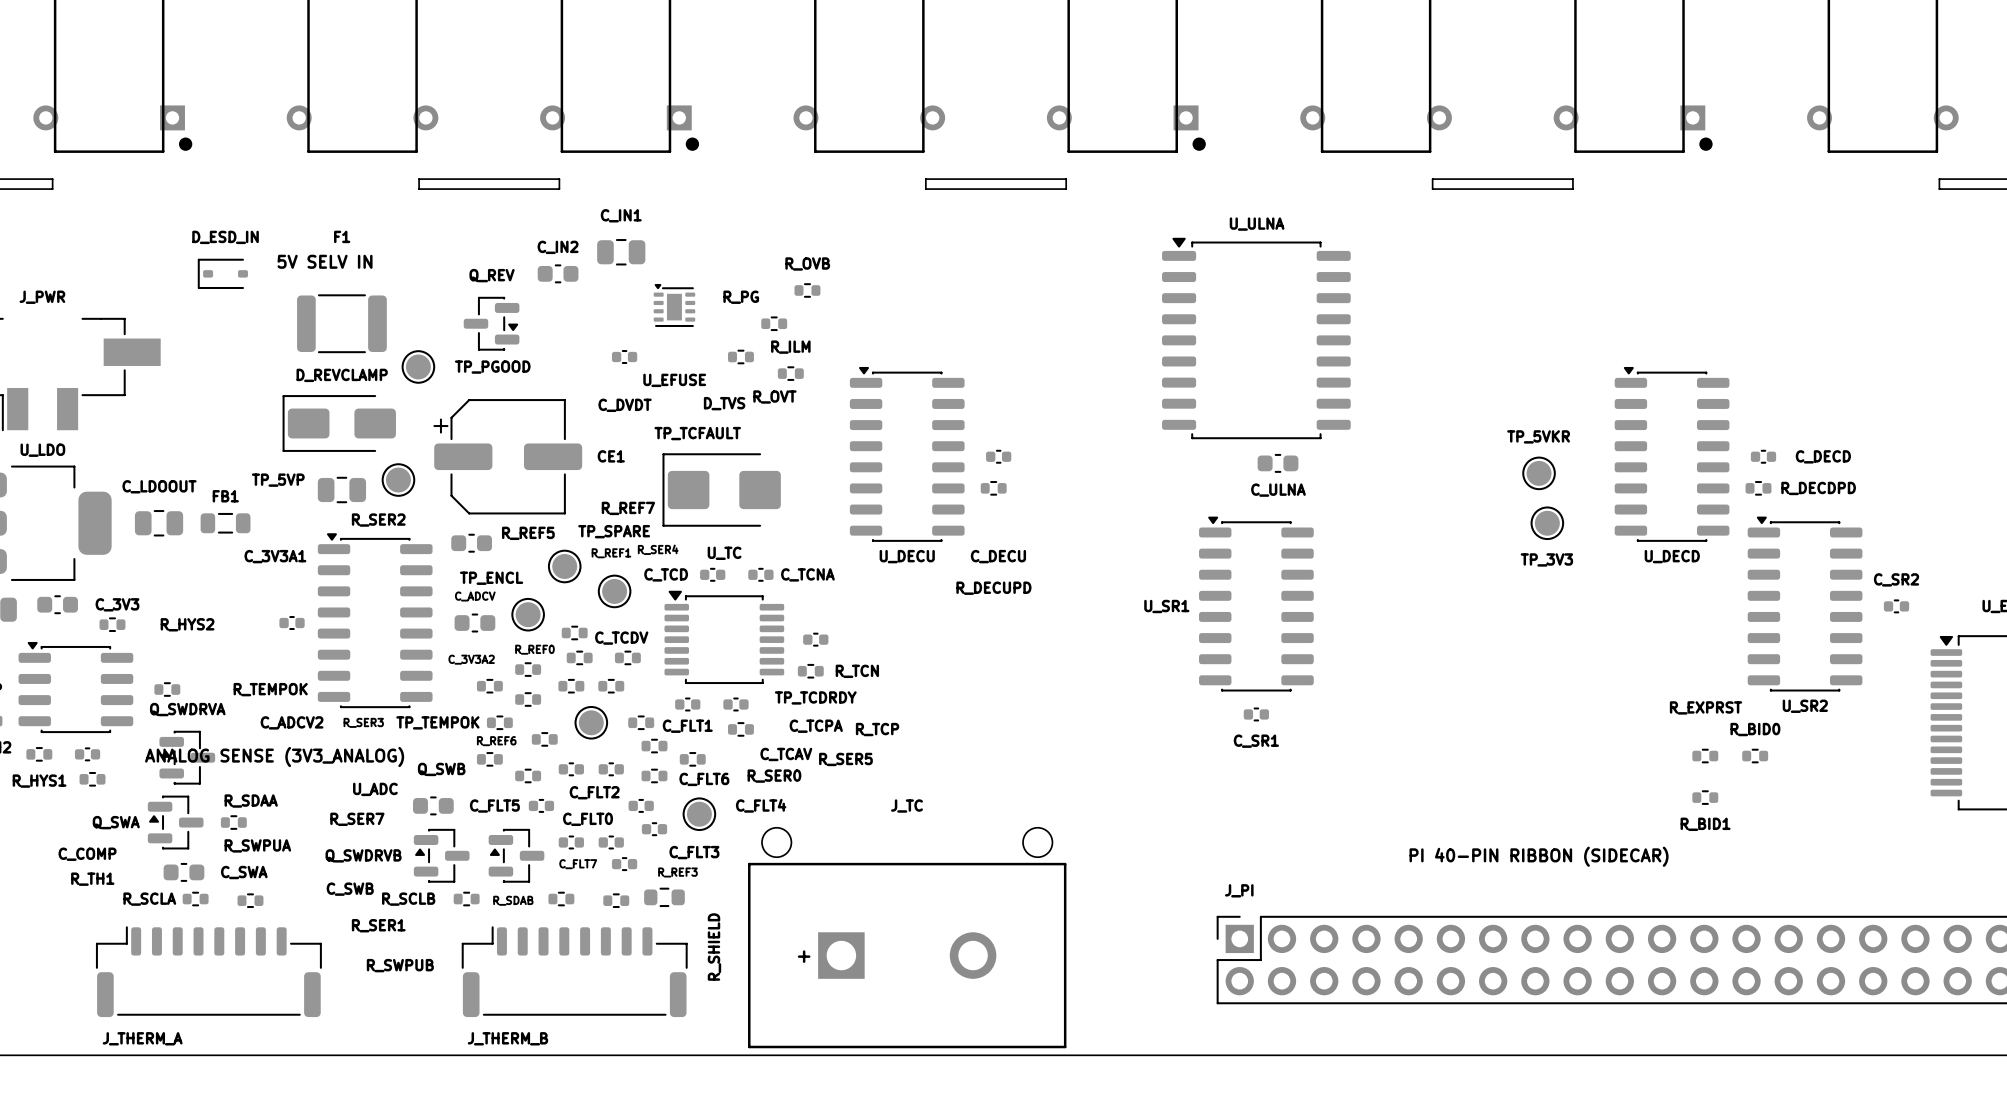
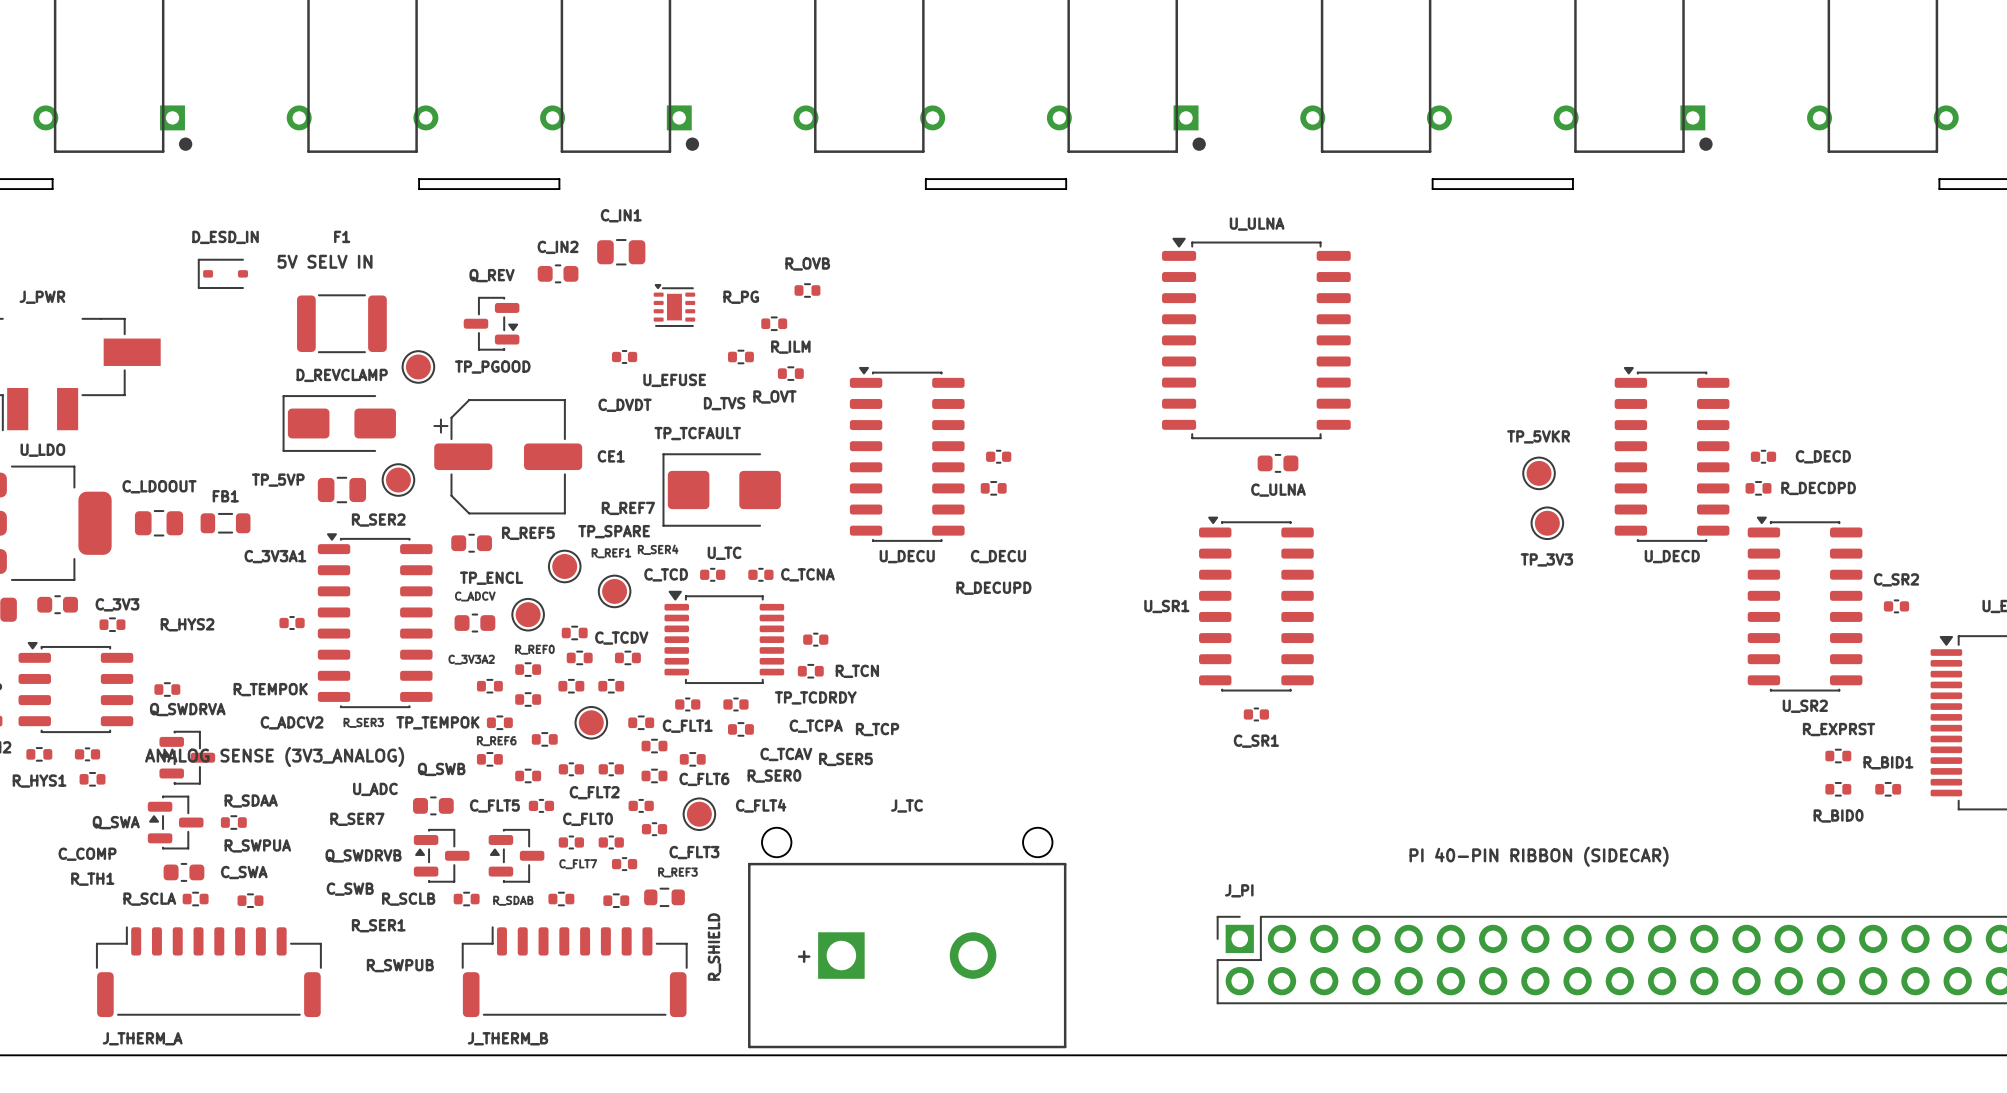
R_EXPRST name position: R_EXPRST (1706, 707) -> R_EXPRST (1839, 729)
R_BID0 name position: R_BID0 (1755, 729) -> R_BID0 (1838, 815)
R_EXPRST position: (1705, 756) -> (1838, 756)
R_BID0 position: (1755, 756) -> (1838, 789)
R_BID1 position: (1705, 797) -> (1888, 789)
R_BID1 name position: R_BID1 (1705, 824) -> R_BID1 (1888, 762)

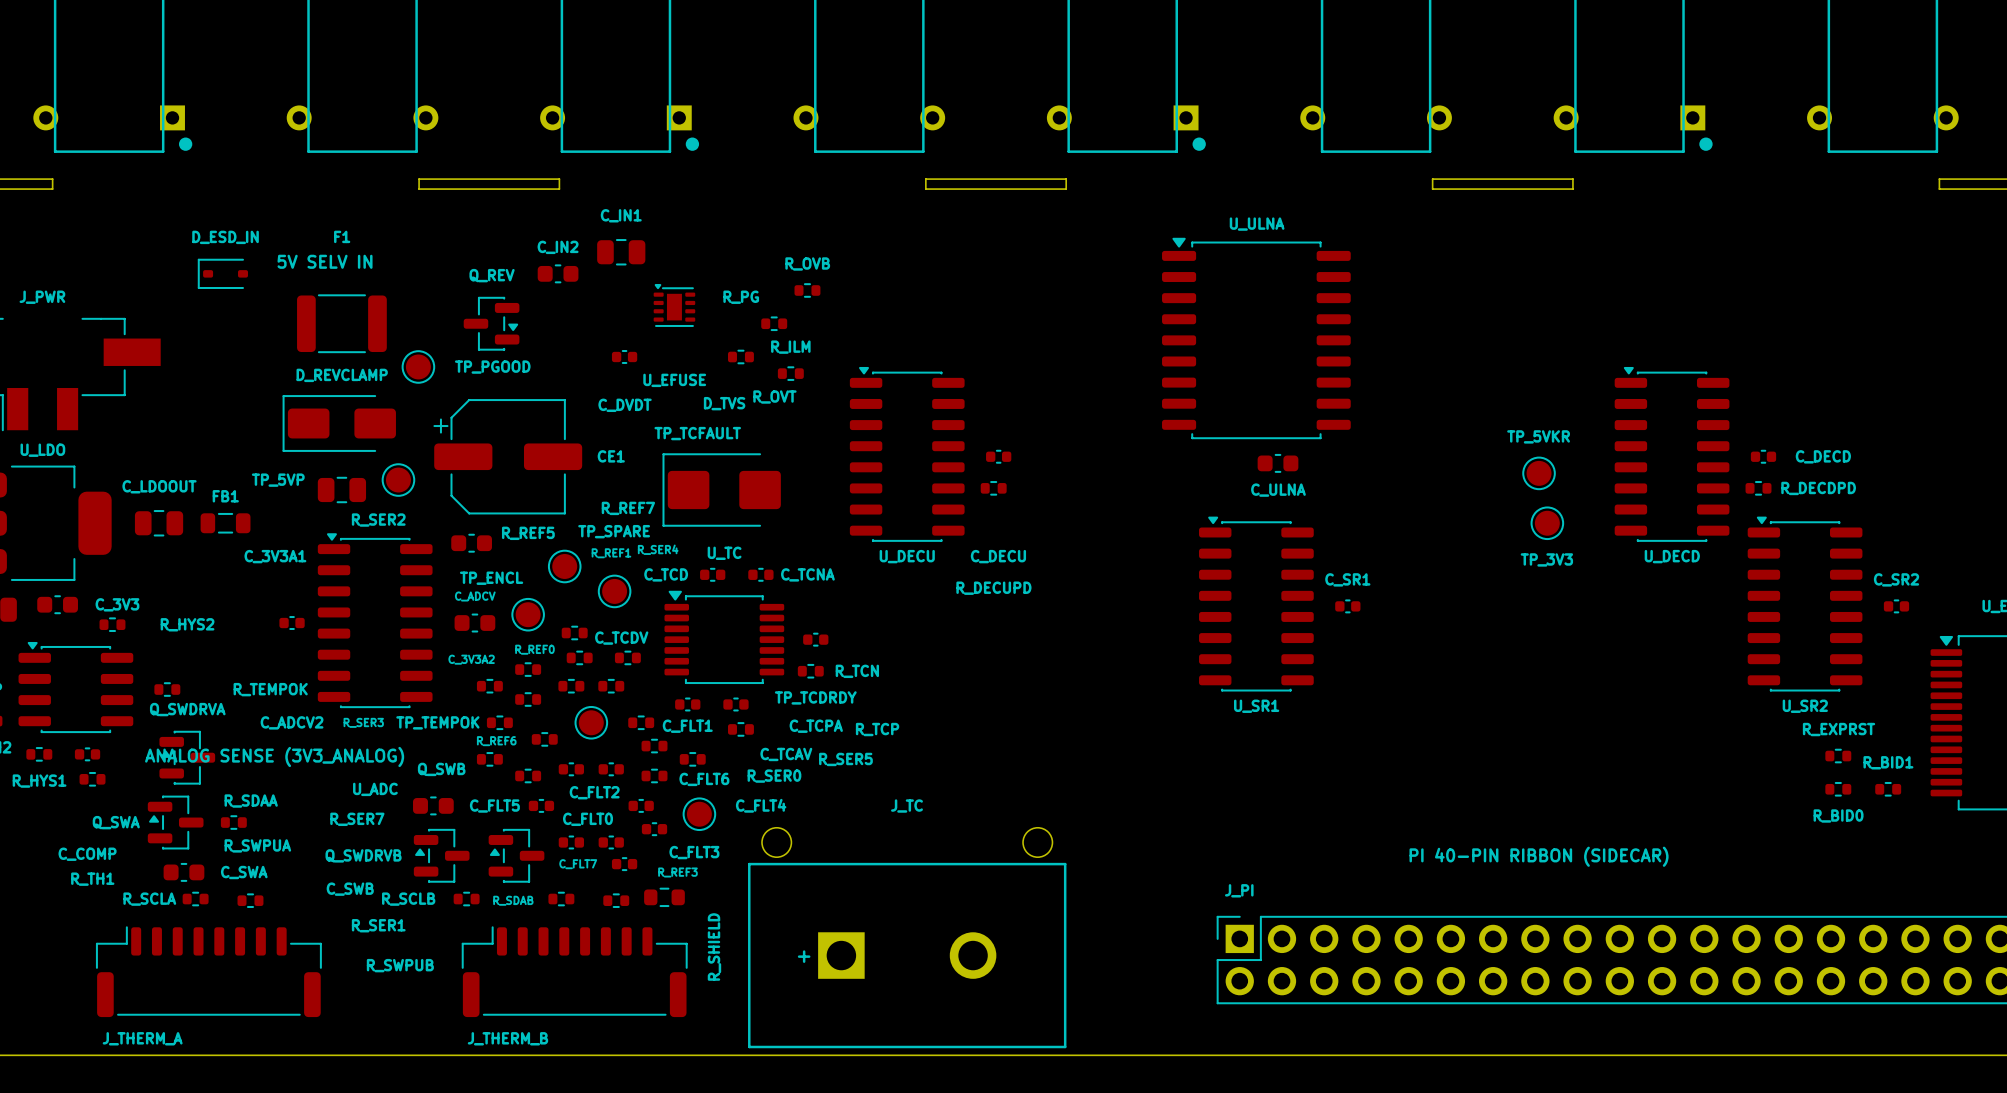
U_SR1 name position: U_SR1 (1166, 606) -> U_SR1 (1256, 706)
C_SR1 position: (1256, 714) -> (1347, 606)
C_SR1 name position: C_SR1 (1256, 741) -> C_SR1 (1347, 579)

